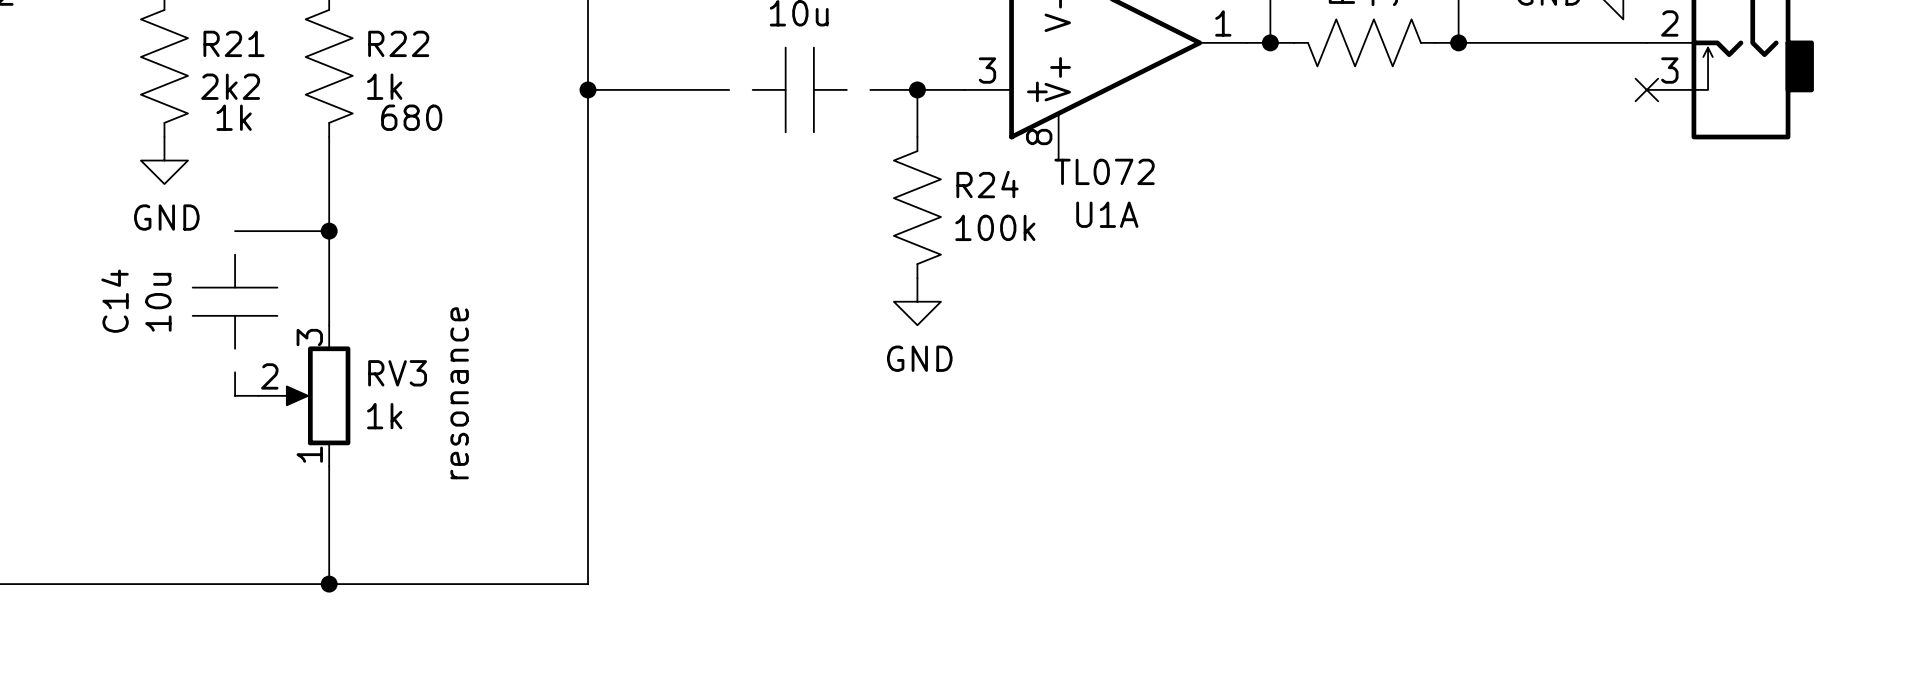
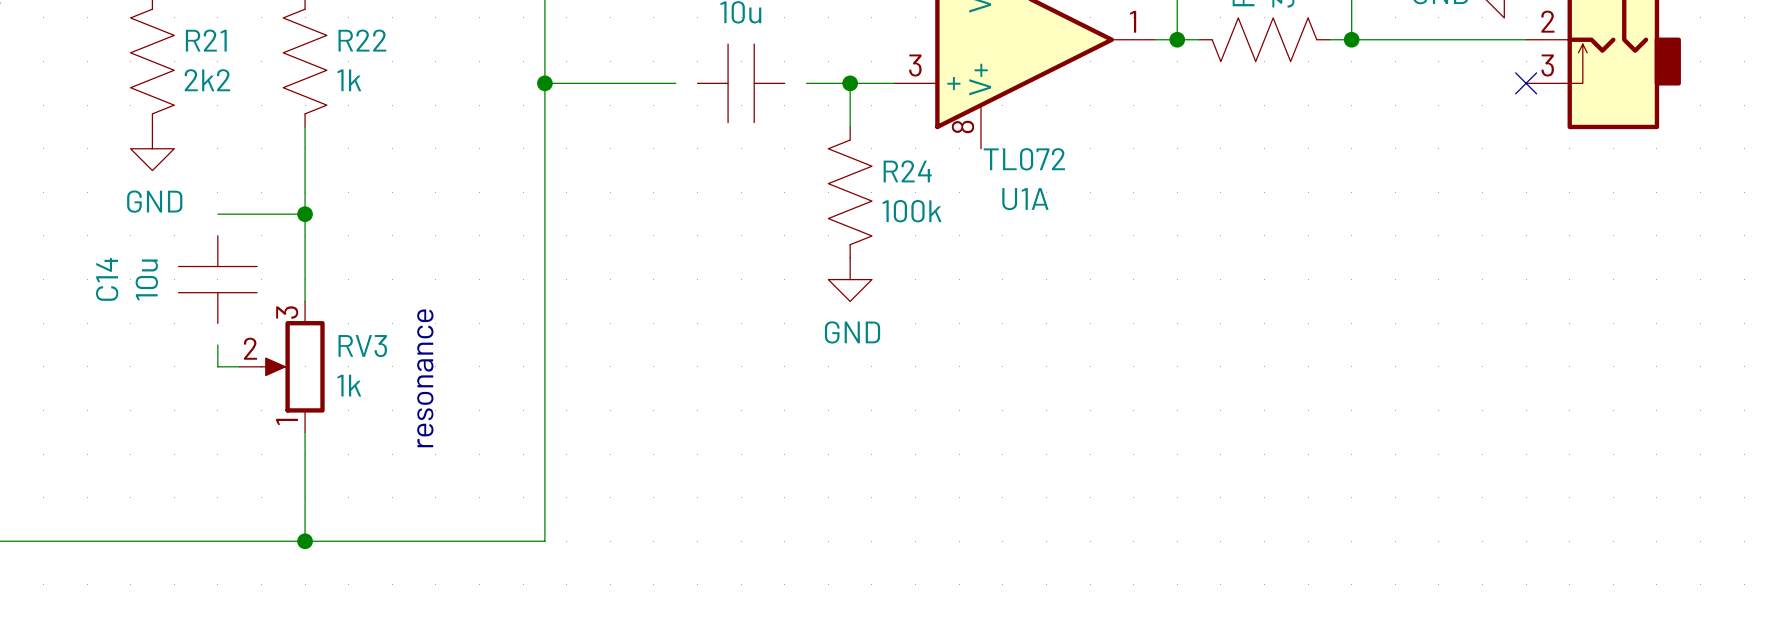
text: 1k (234, 117) -> none
text: 680 (411, 117) -> none

